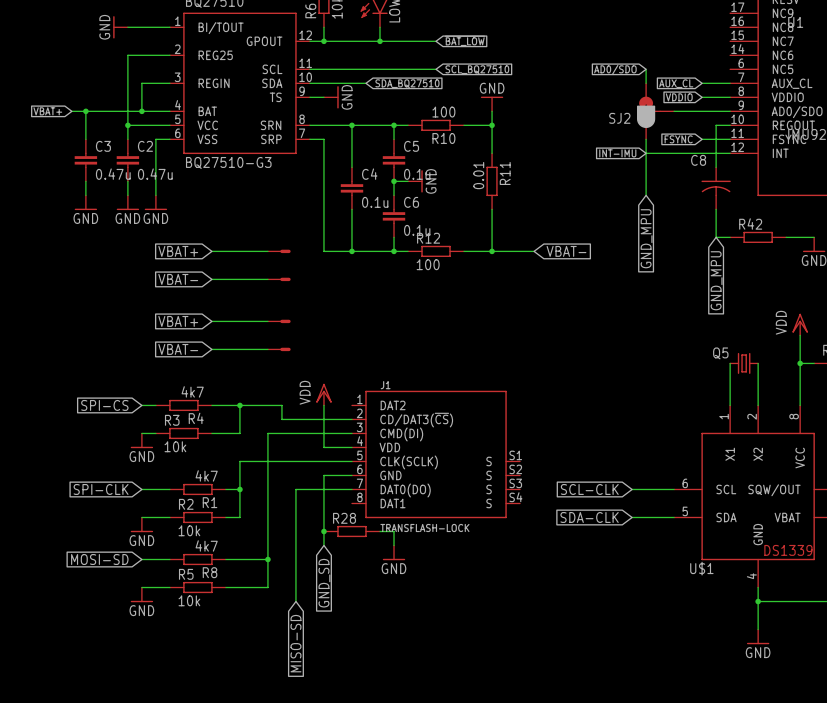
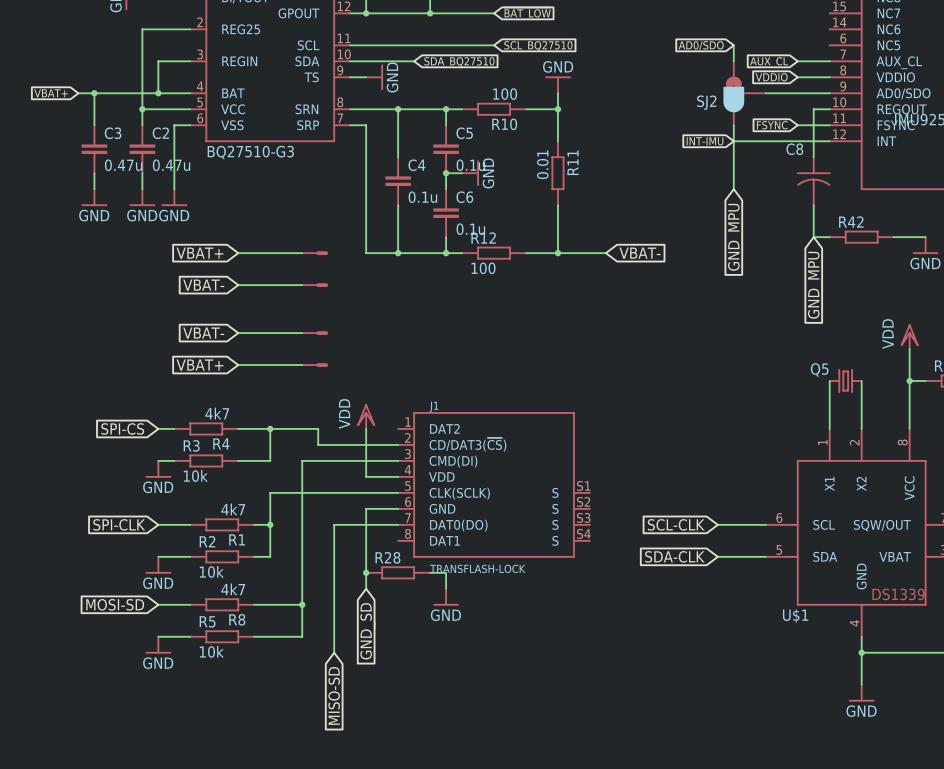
global label: VBAT+ (178, 321) -> VBAT- (203, 333)
global label: VBAT- (178, 349) -> VBAT+ (199, 365)

